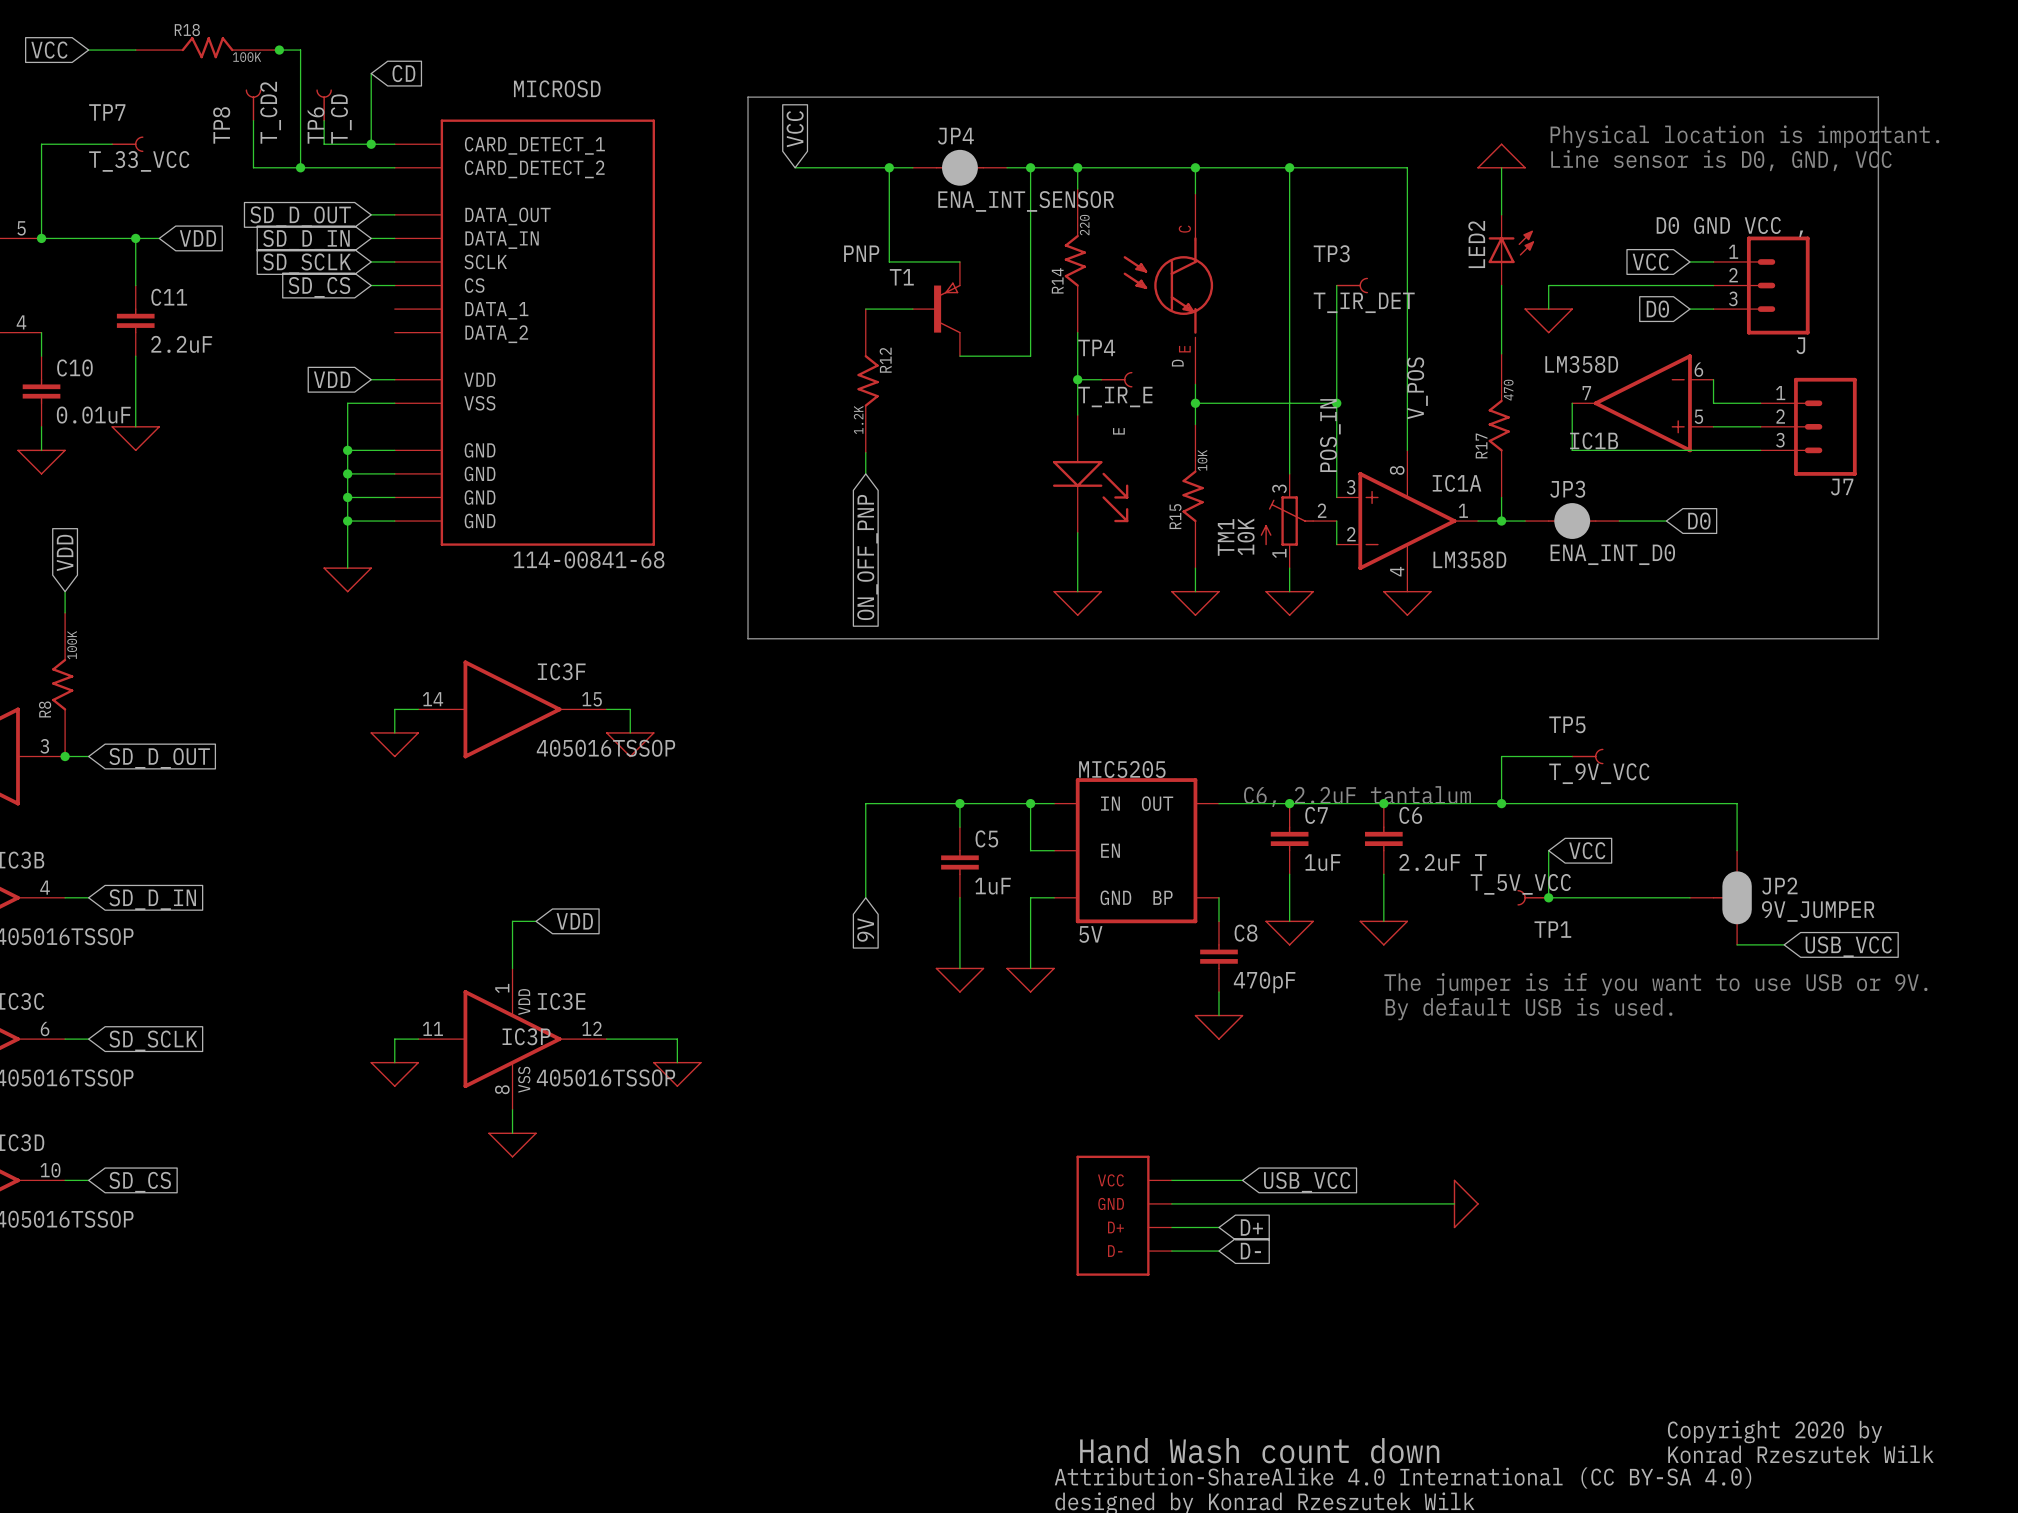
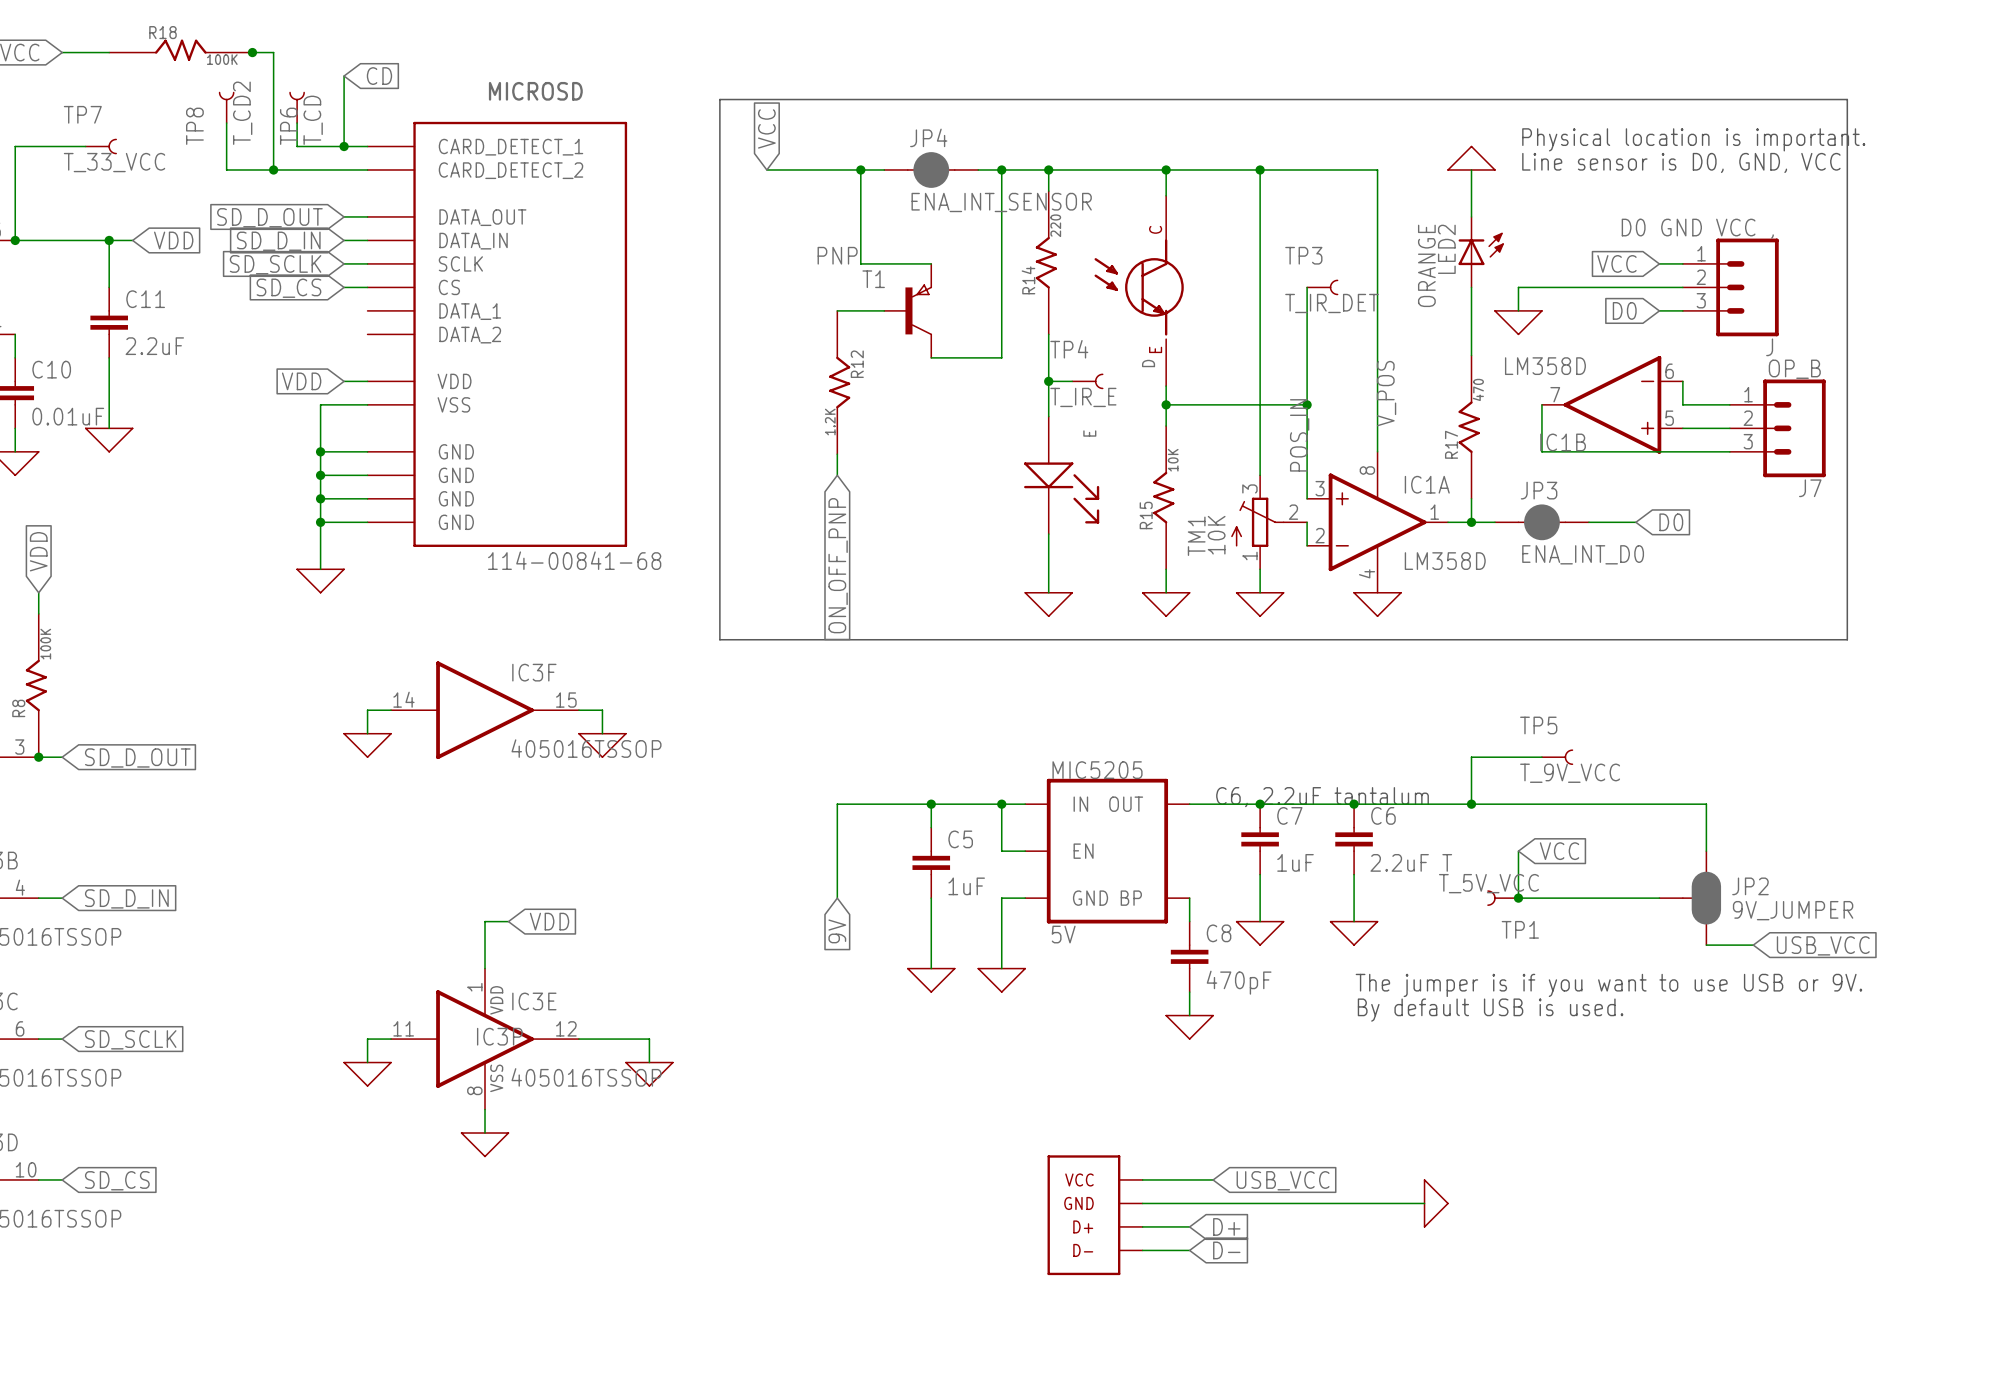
LED2 value: none -> ORANGE (1426, 265)
J7 value: none -> OP_B (1794, 369)

